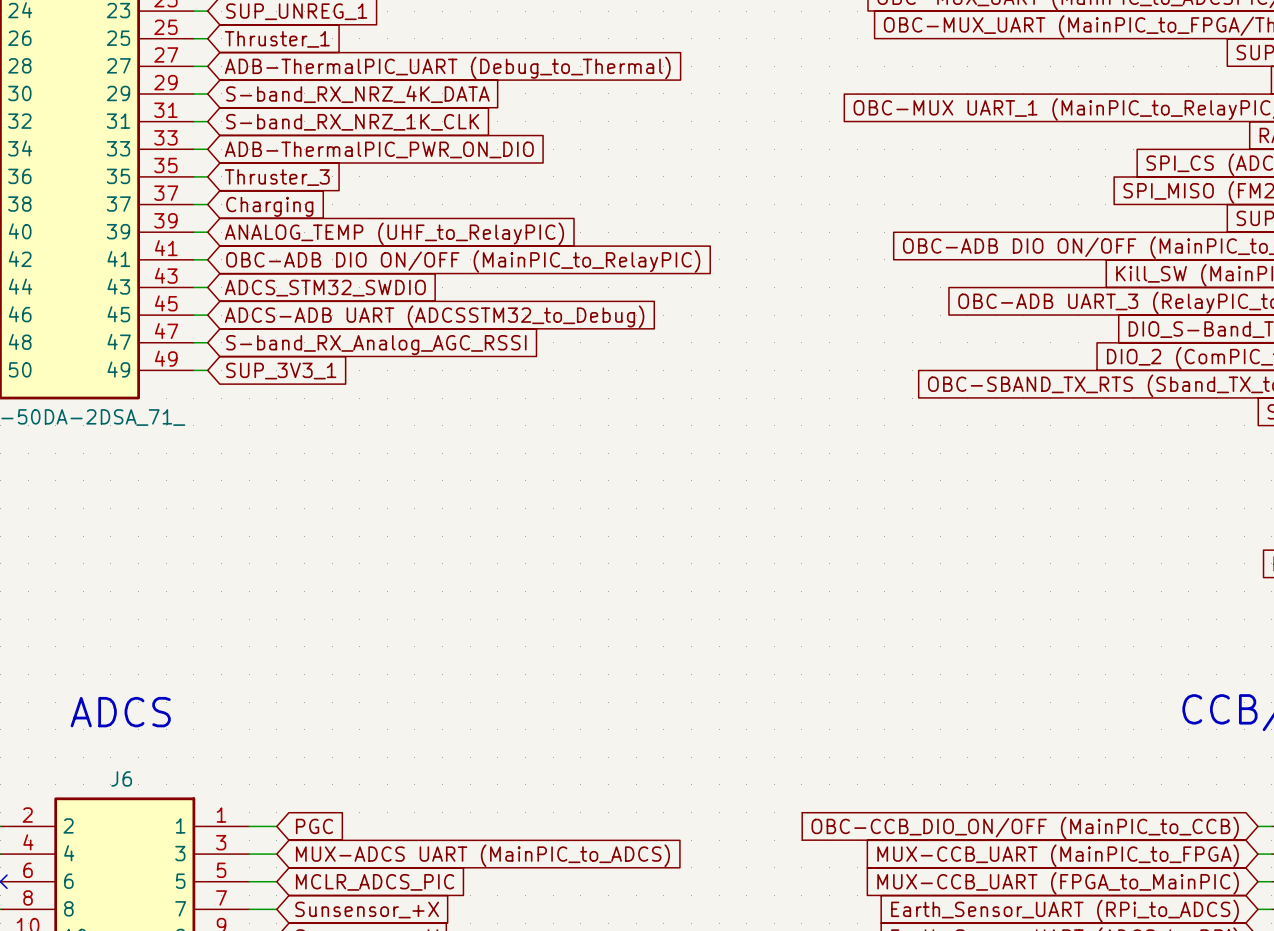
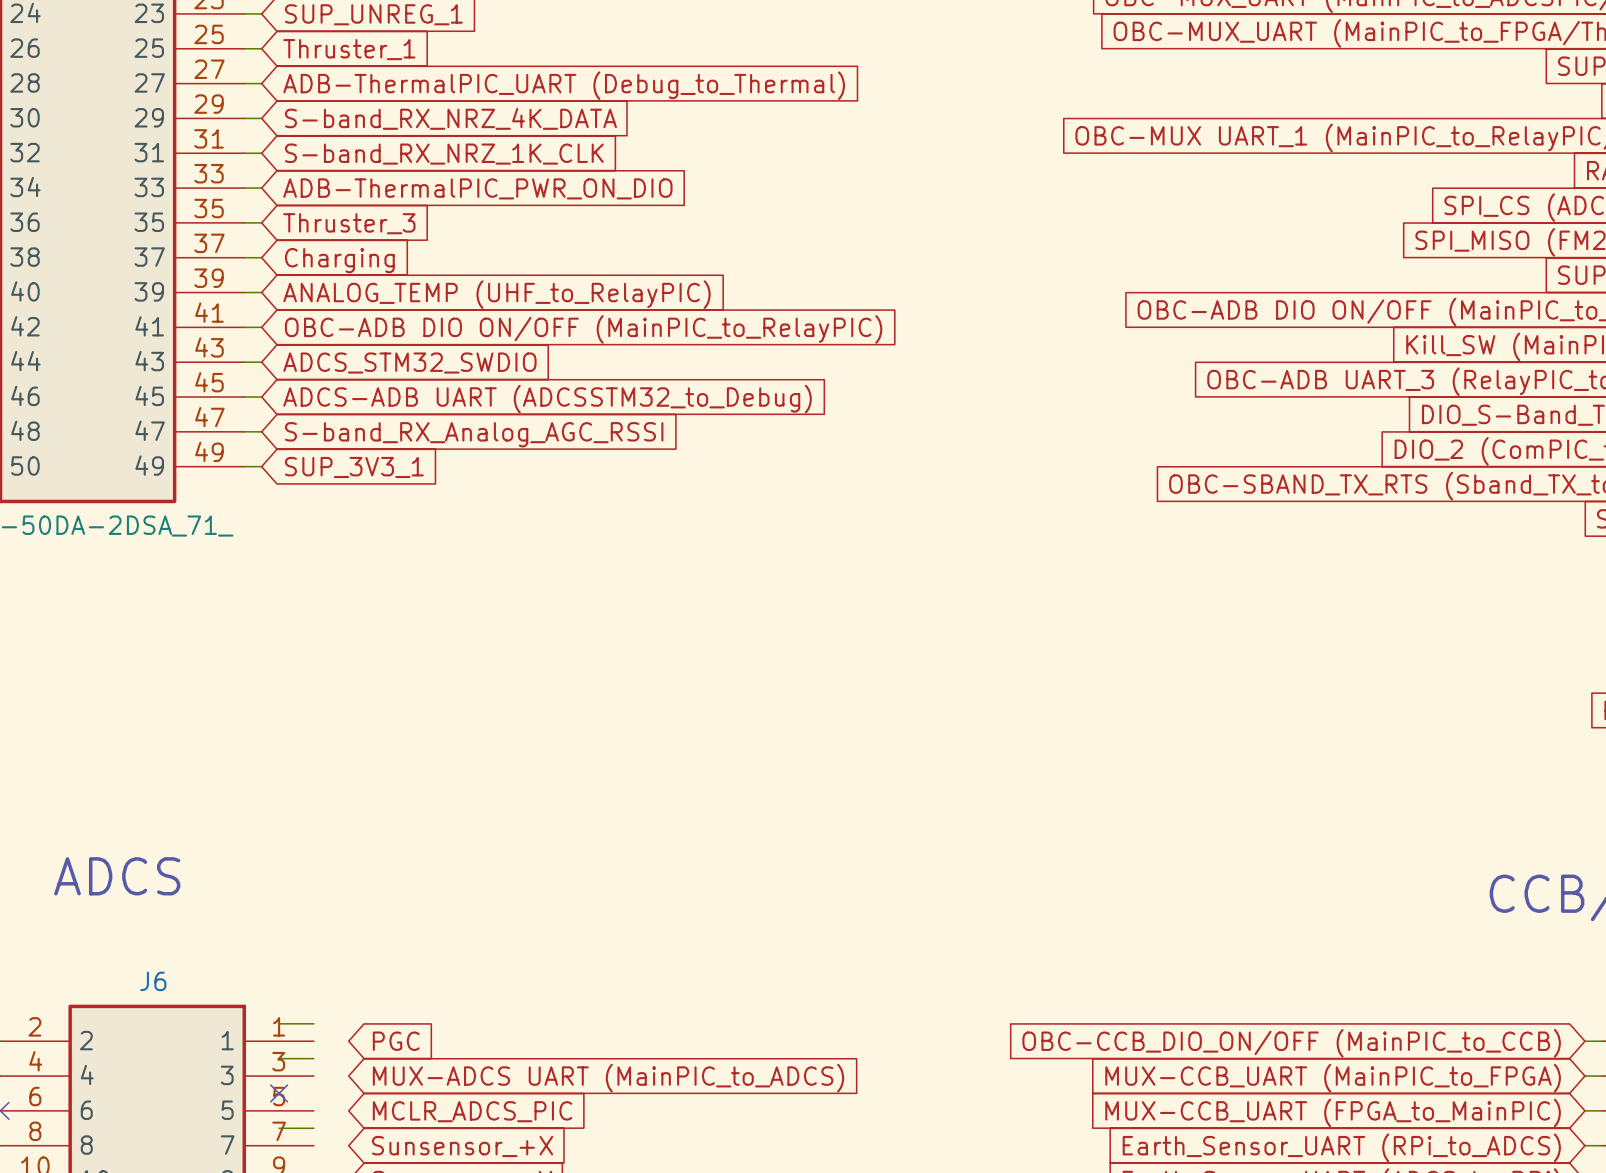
text position: ADCS (120, 712) -> ADCS (117, 876)
wire: (249, 826) (276, 826) -> (279, 1023) (313, 1023)
wire: (249, 854) (276, 854) -> (279, 1058) (313, 1058)
no-connect mark: none -> (279, 1093)
wire: (249, 881) (276, 881) -> none
wire: (249, 909) (276, 909) -> (279, 1128) (313, 1128)

